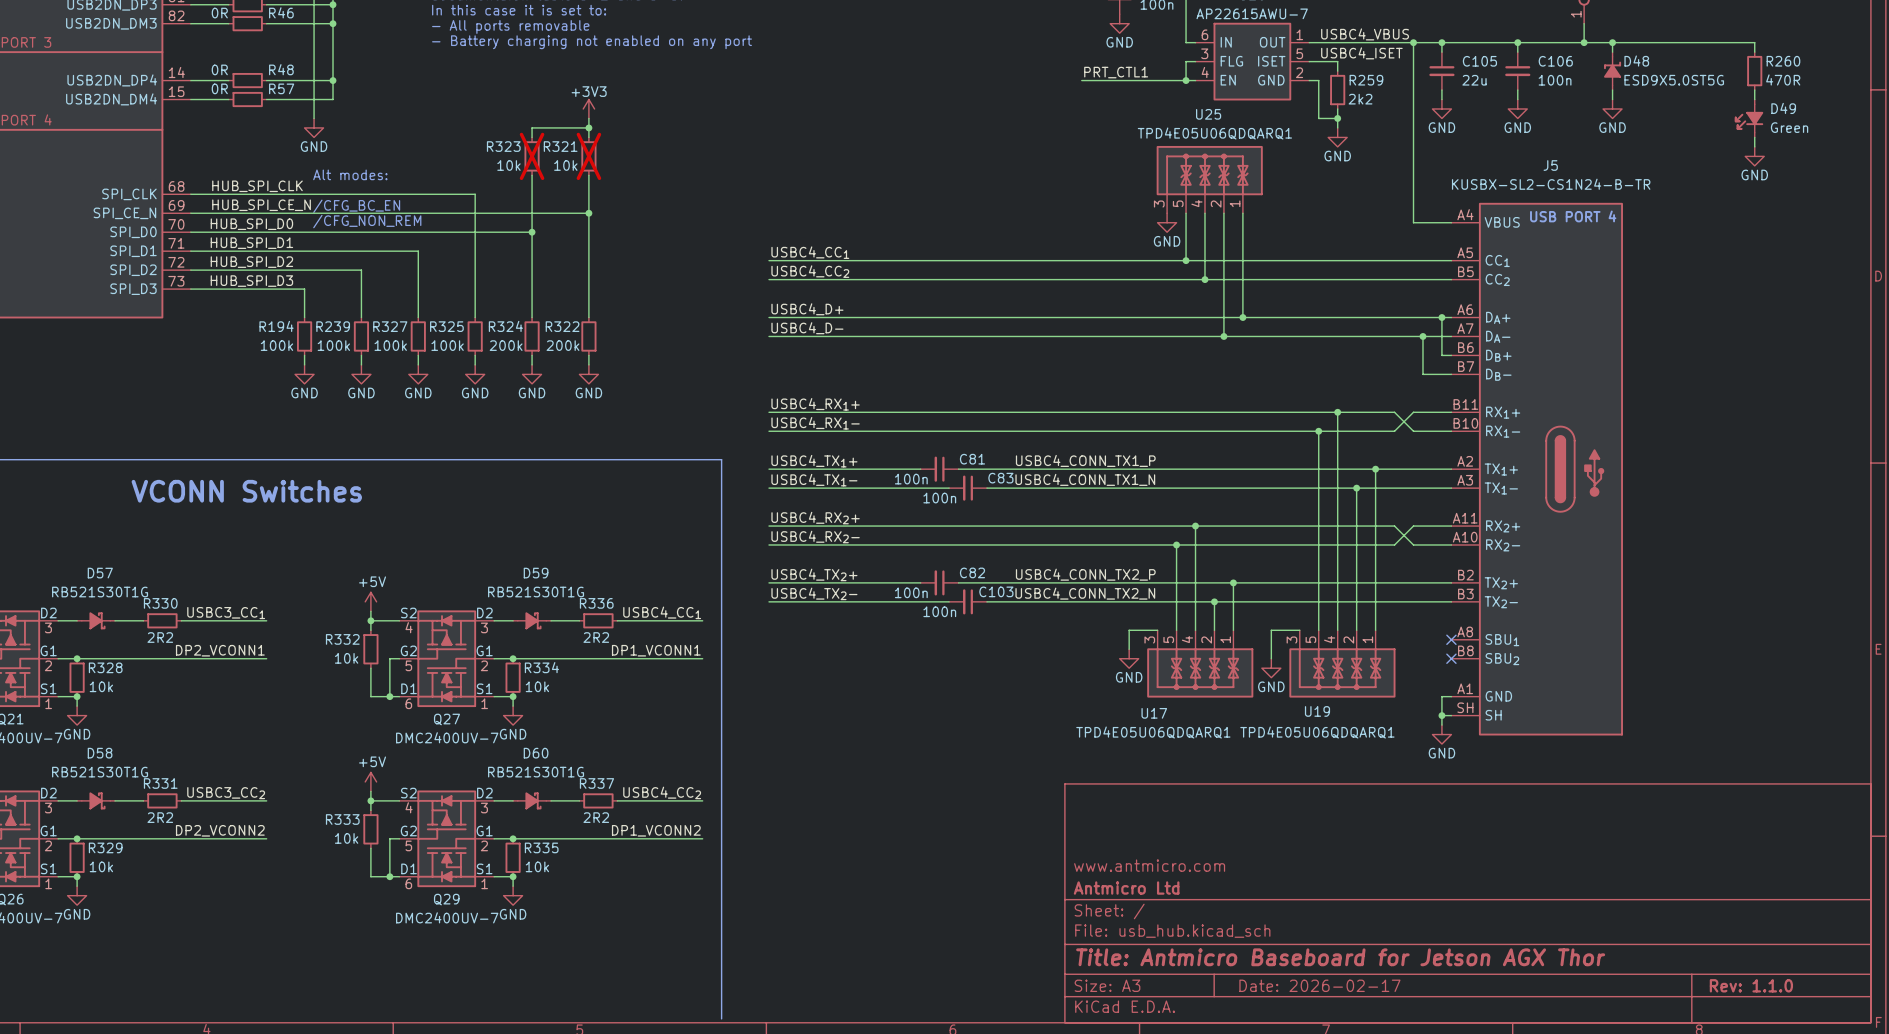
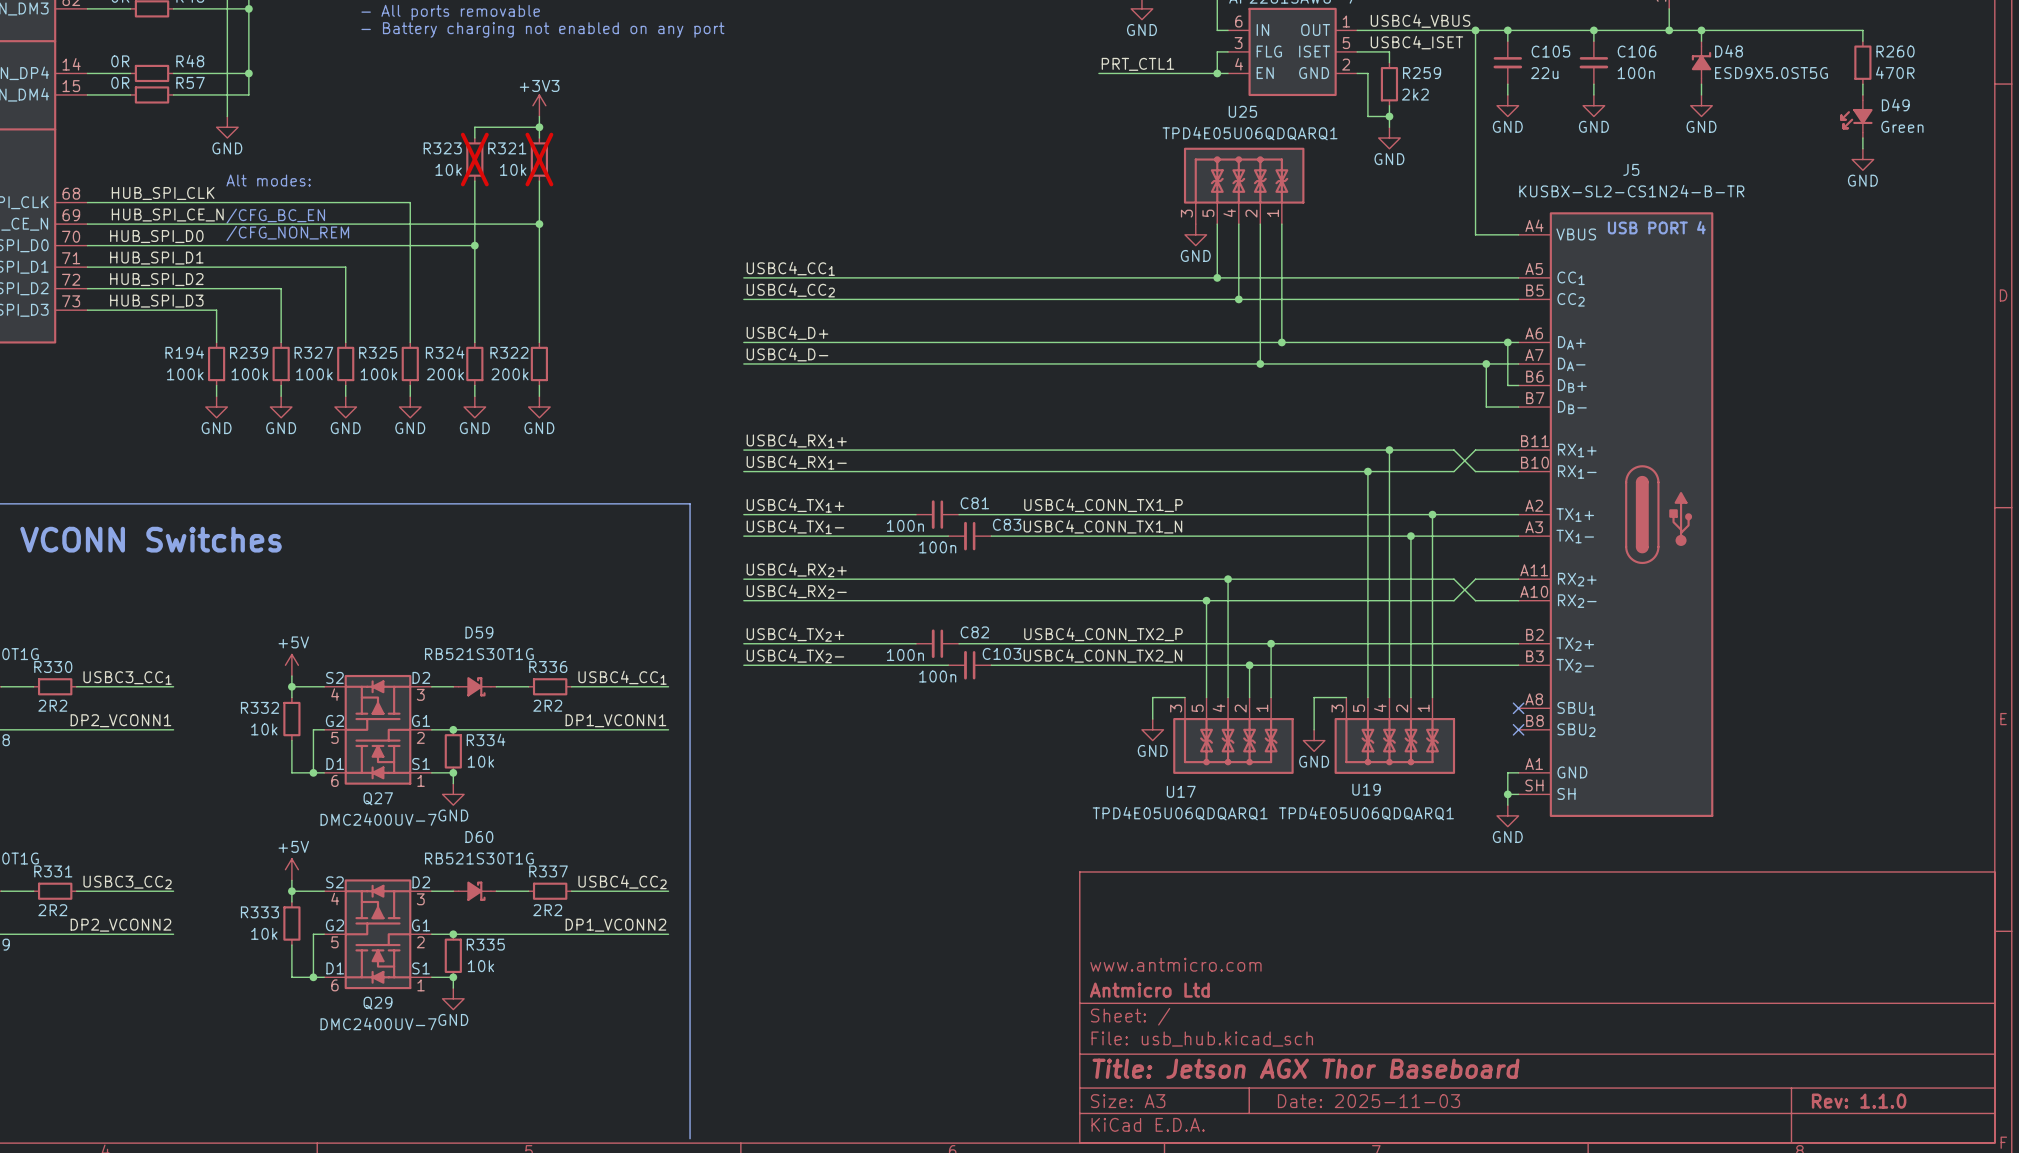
title block: Title: Antmicro Baseboard for Jetson AGX Thor (1340, 957) -> Title: Jetson AGX Thor Baseboard (1306, 1068)
title block: Date: 2026-02-17 (1319, 985) -> Date: 2025-11-03 (1369, 1101)

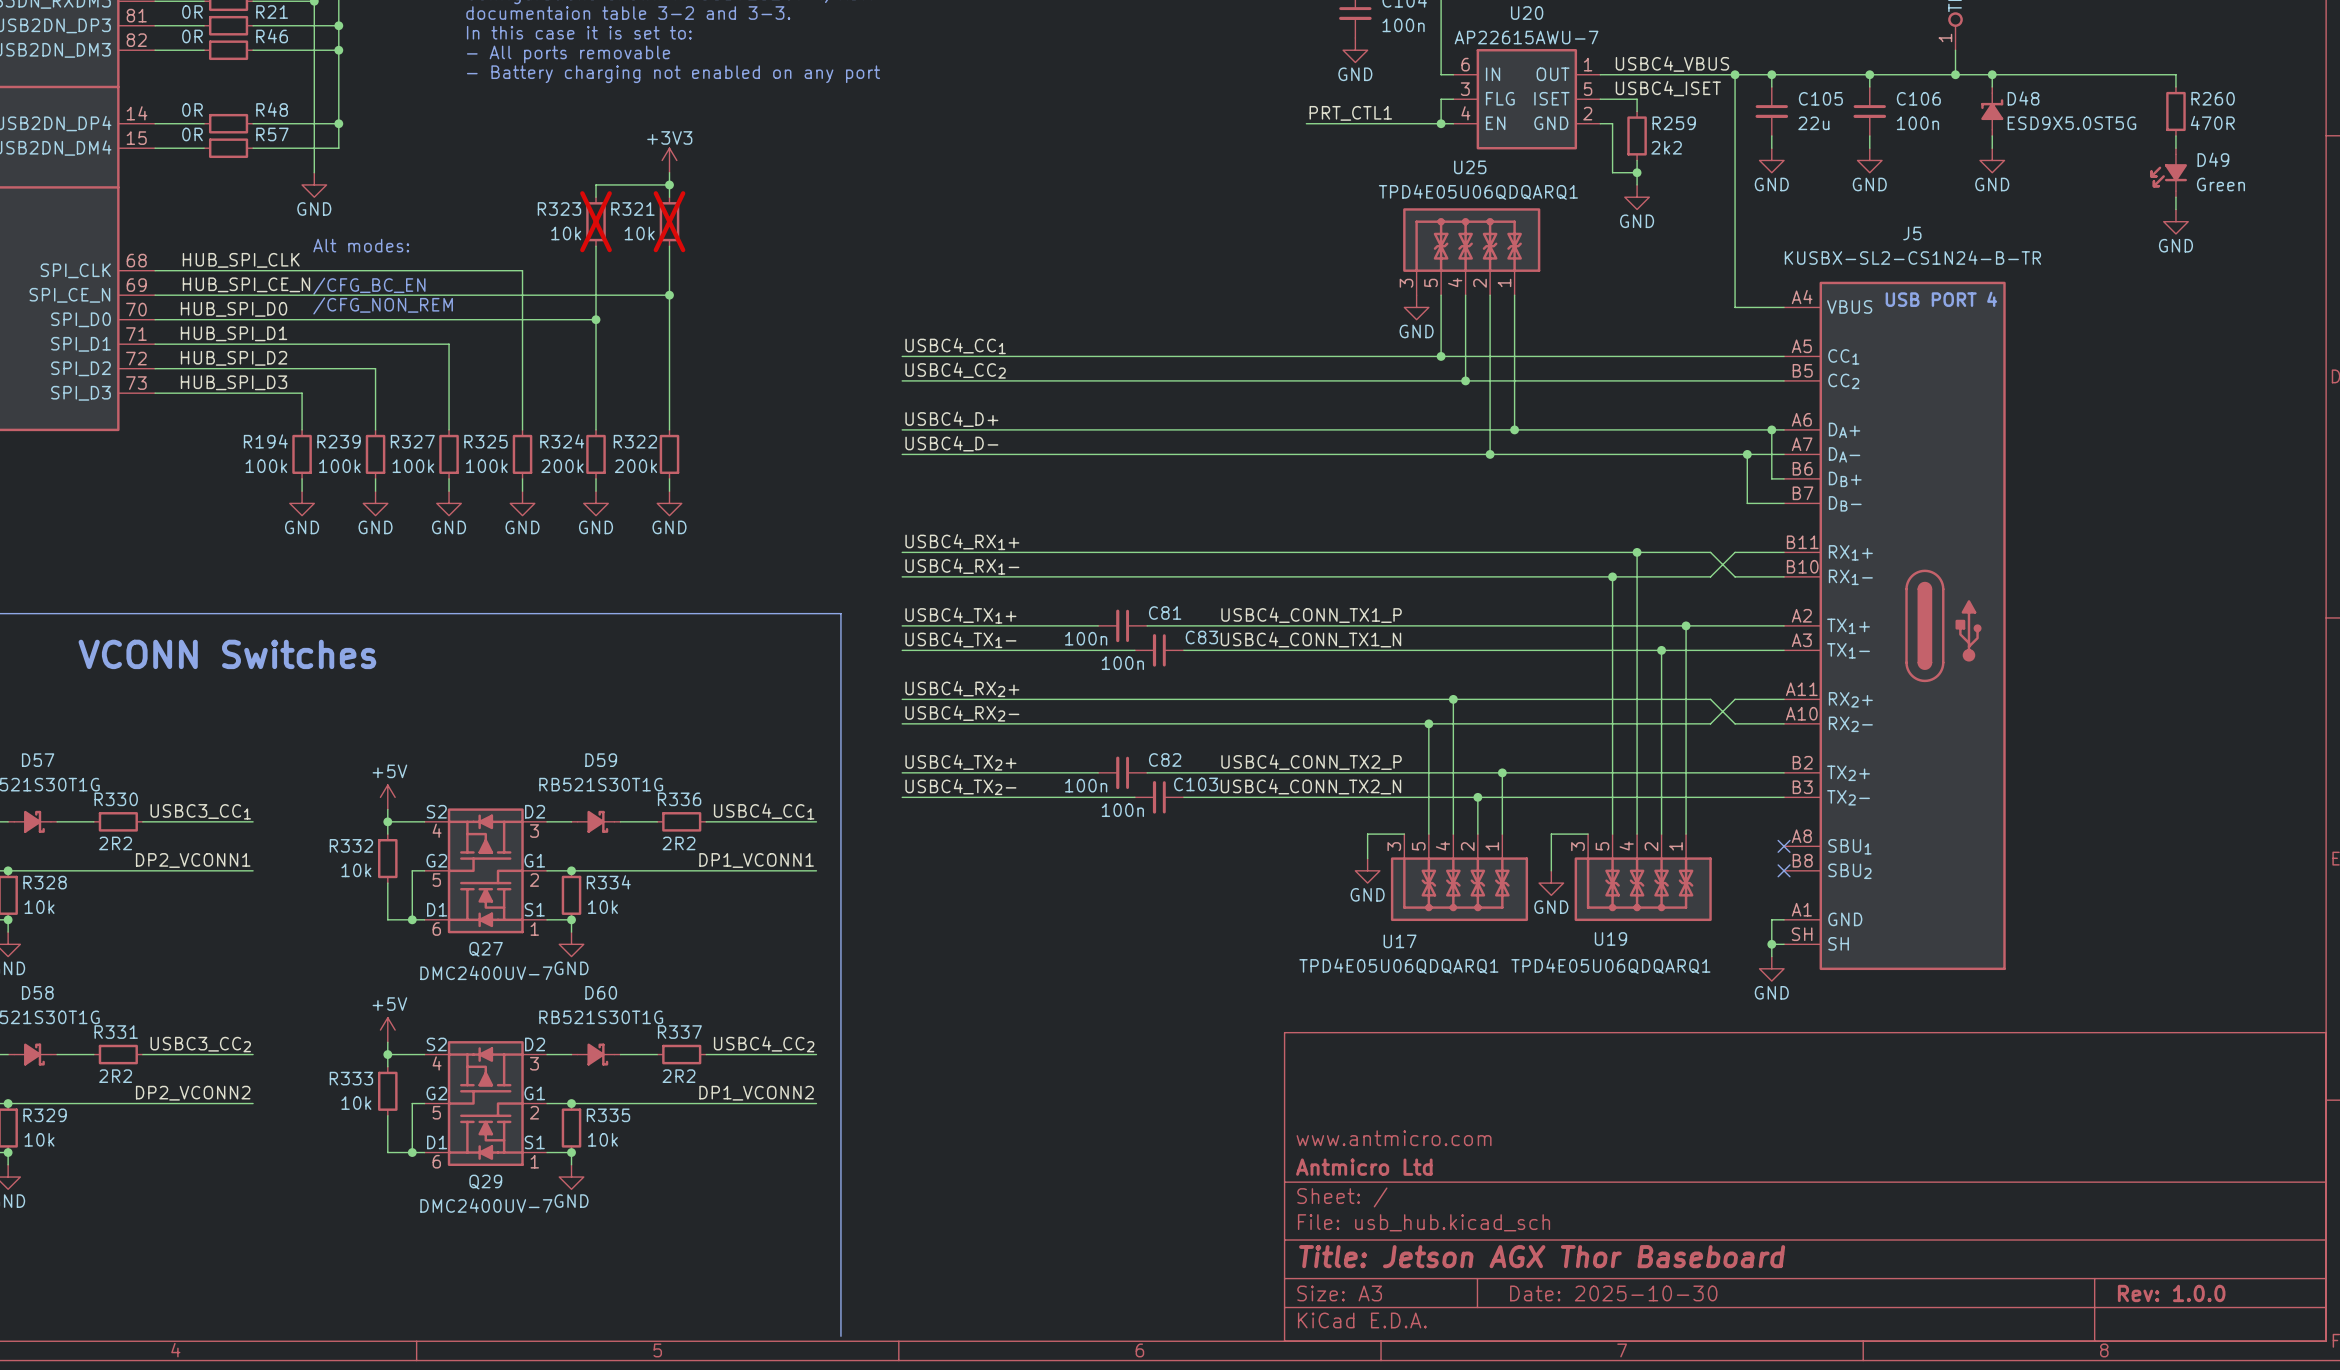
title block: Date: 2025-11-03 (1369, 1101) -> Date: 2025-10-30 (1613, 1293)
title block: Rev: 1.1.0 (1859, 1101) -> Rev: 1.0.0 (2171, 1293)

